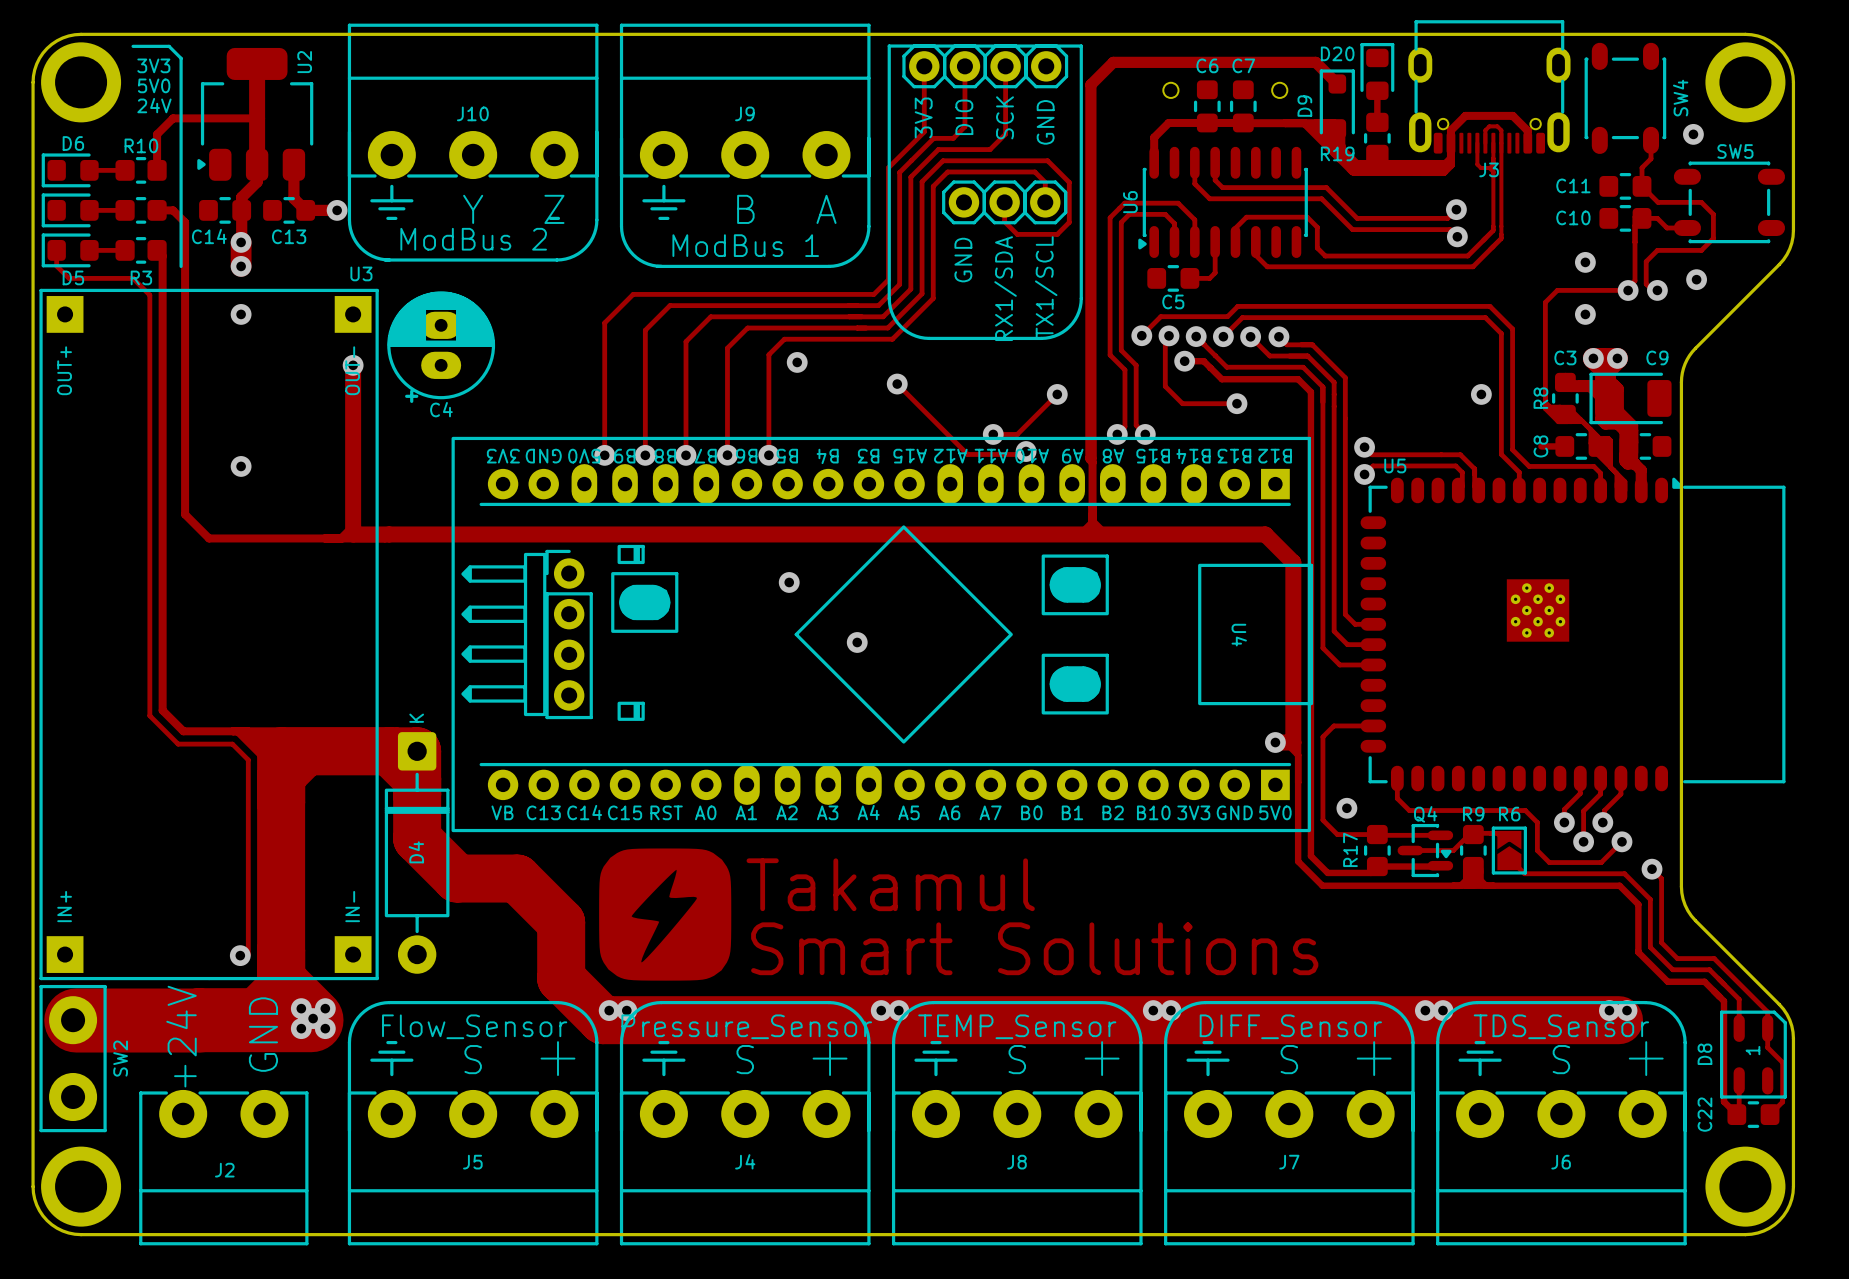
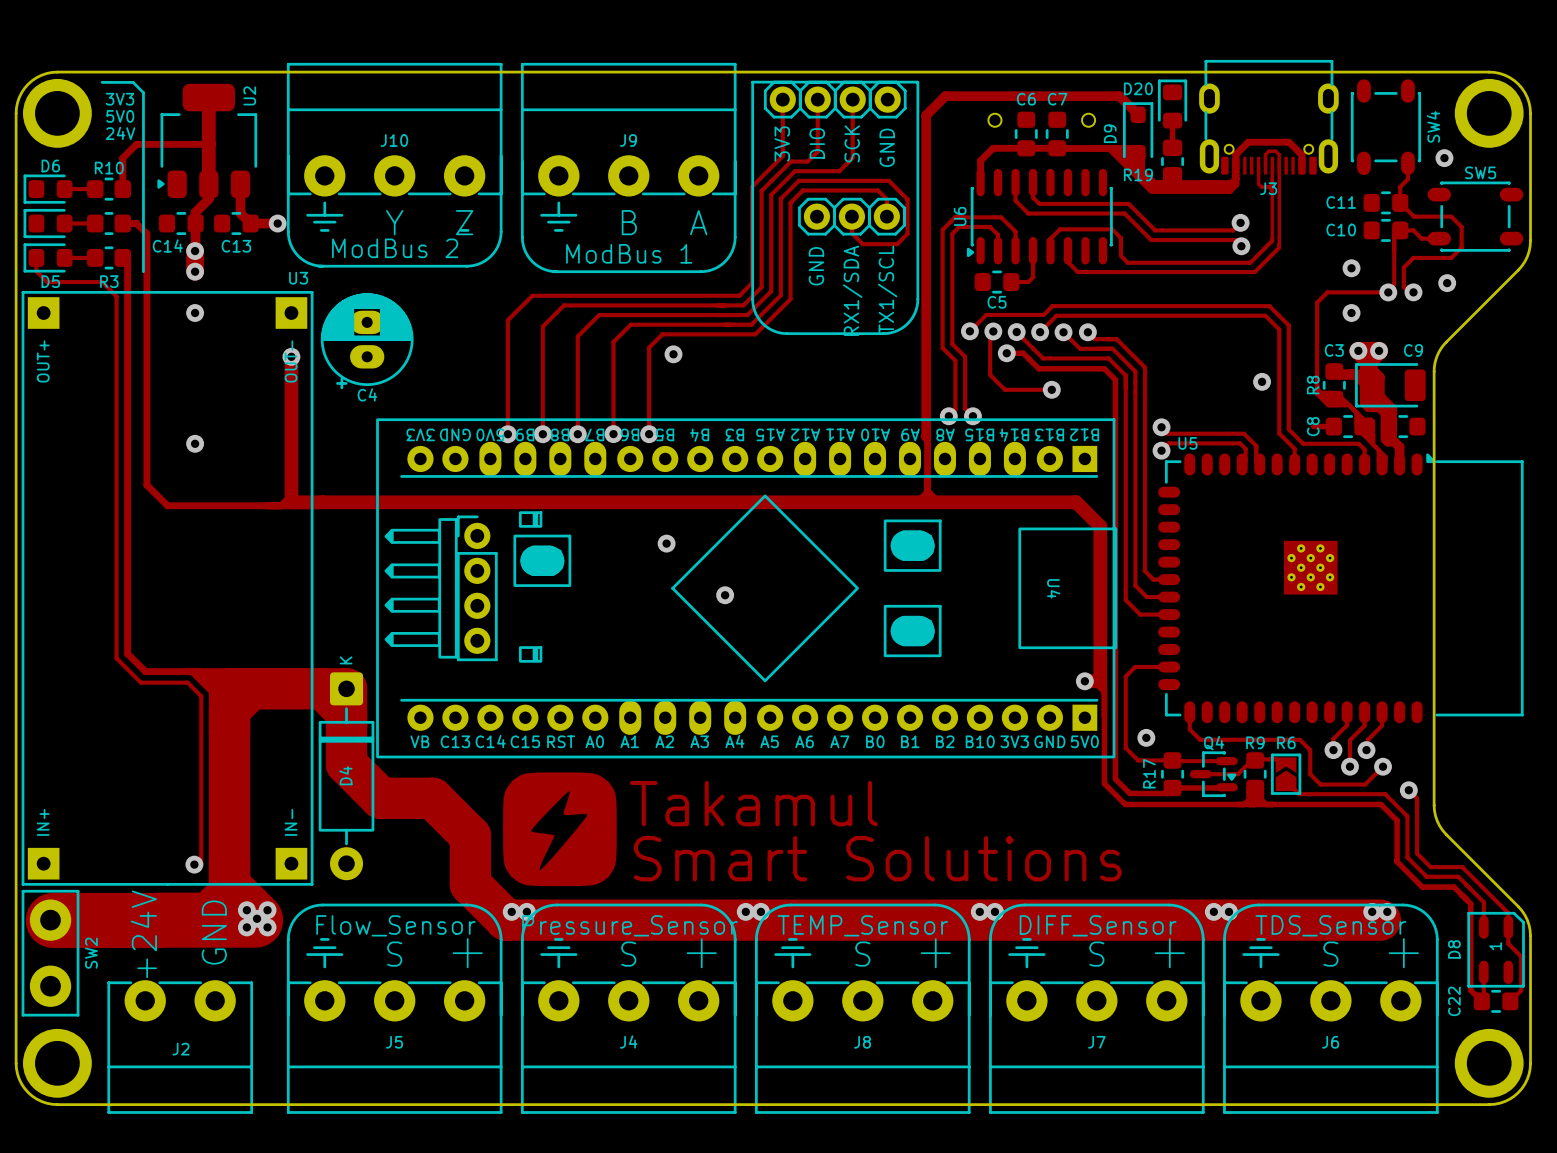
track: (897, 384) (967, 454) (1023, 454) (1026, 451) -> none
via: (897, 384) -> none
track: (1057, 394) (1017, 434) (993, 434) -> none
via: (1057, 394) -> none
via: (993, 434) -> none
via: (1026, 451) -> none

